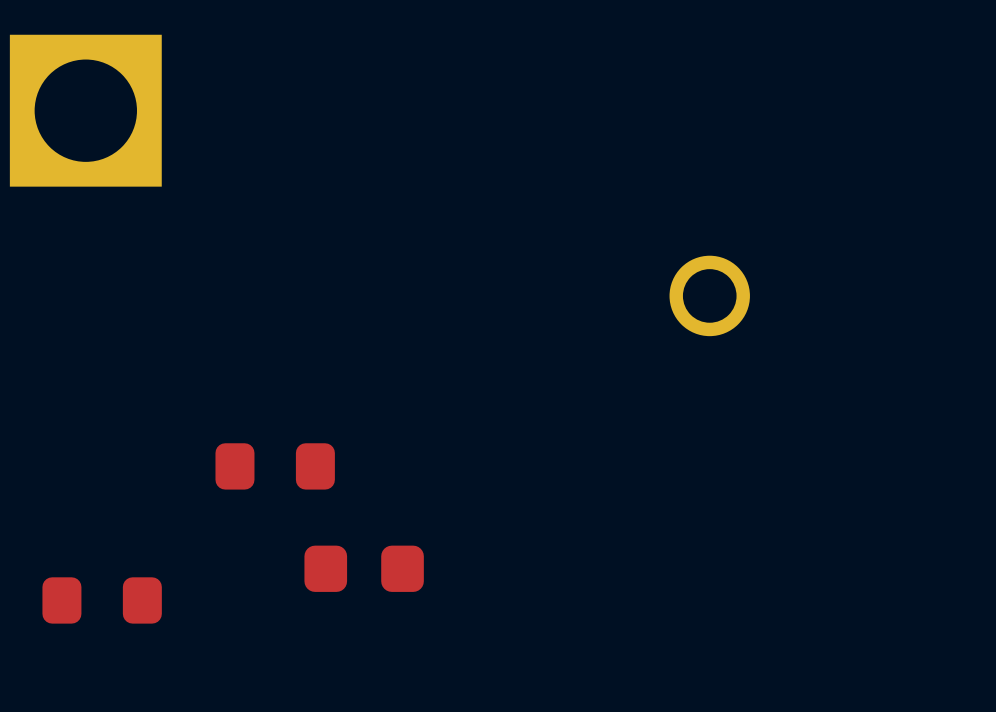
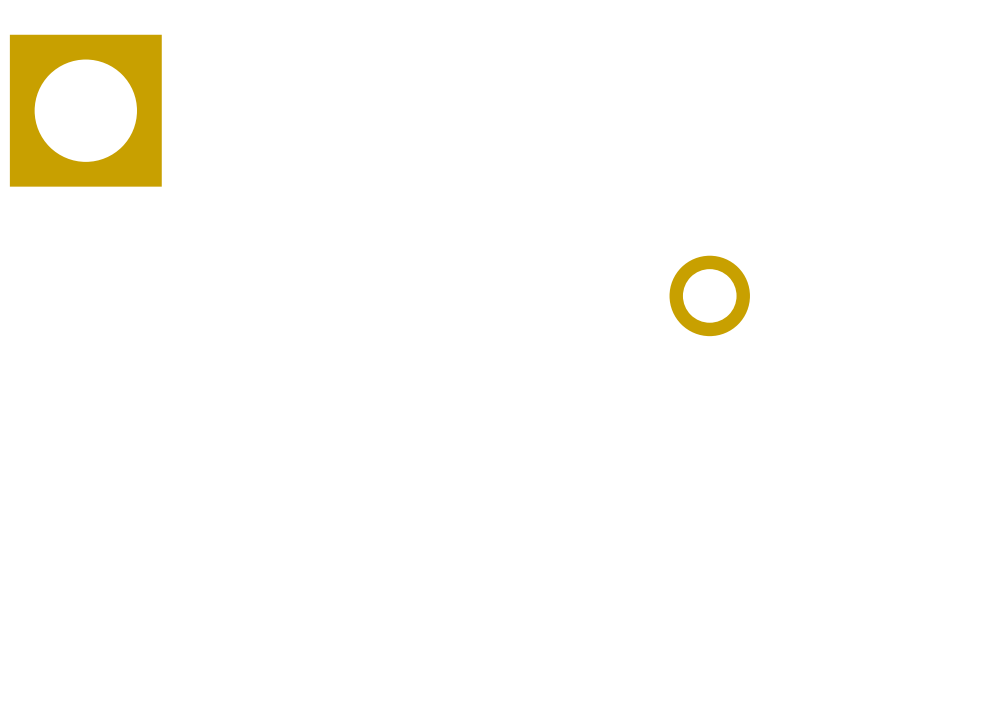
part: (275, 466) -> none
part: (364, 568) -> none
part: (102, 600) -> none

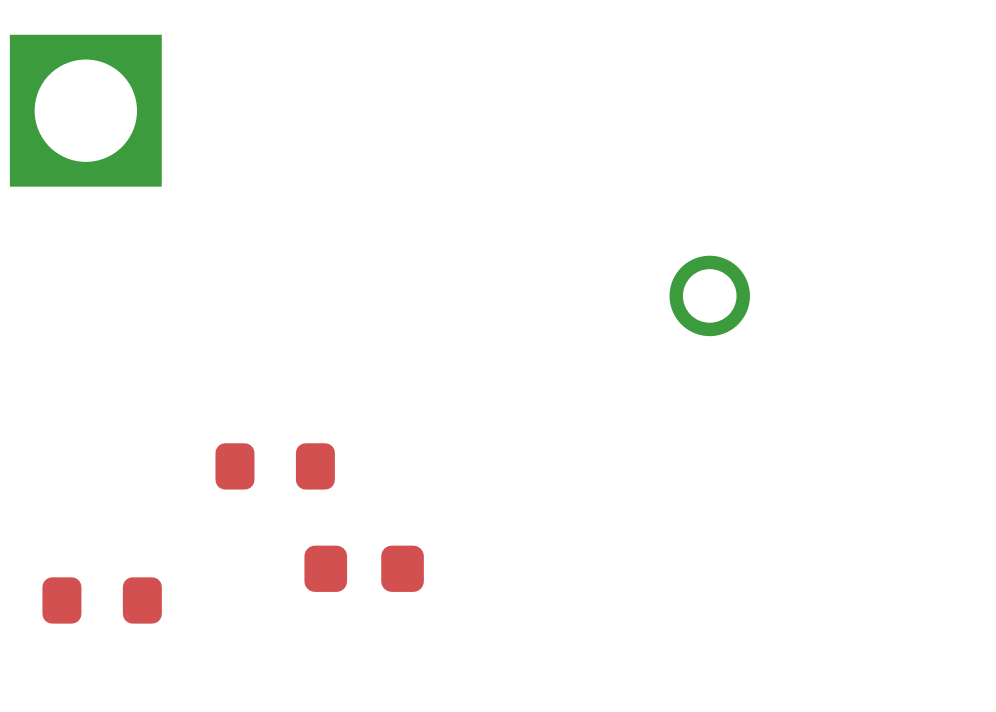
part: none -> (275, 466)
part: none -> (364, 568)
part: none -> (102, 600)

